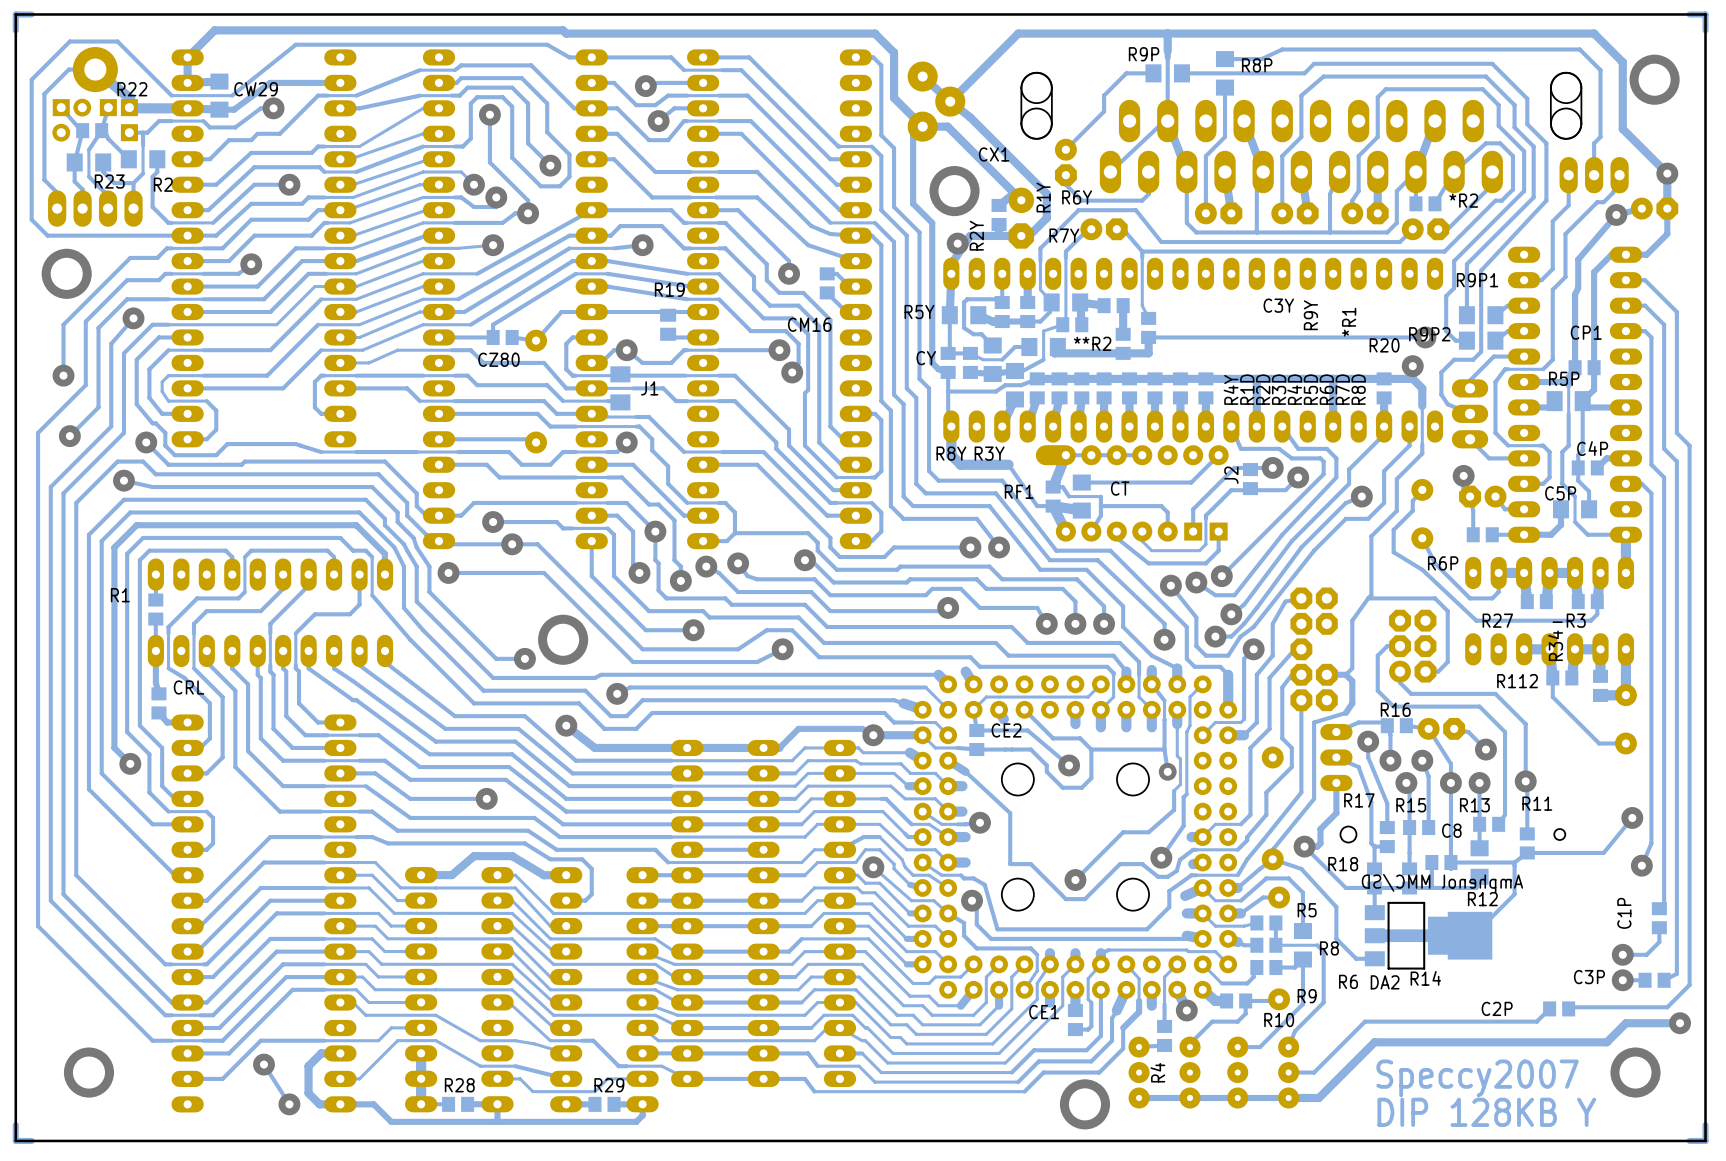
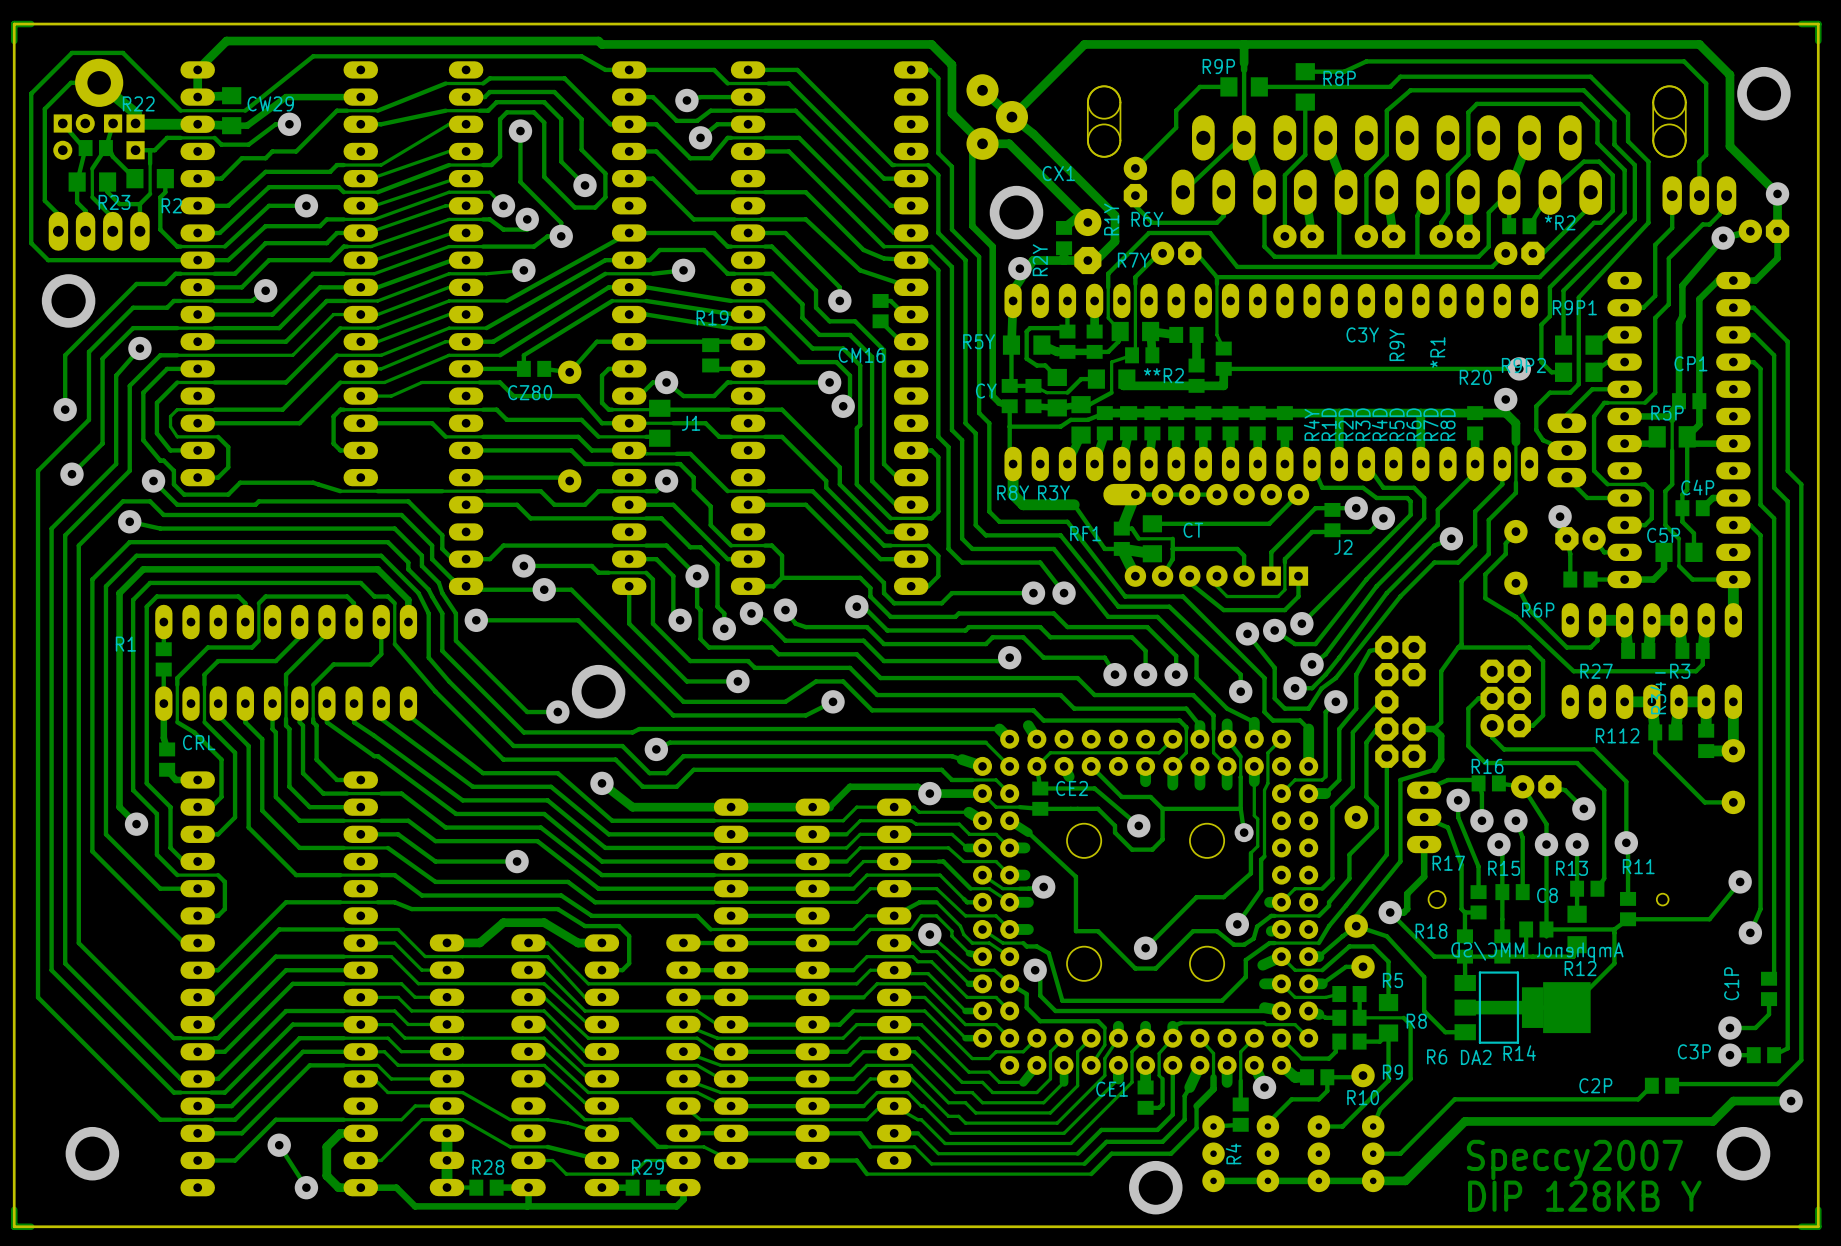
J2 name rotation: 0° (1231, 475) -> 90° clockwise (1343, 547)
J2 name position: J2 (1231, 475) -> J2 (1343, 547)

